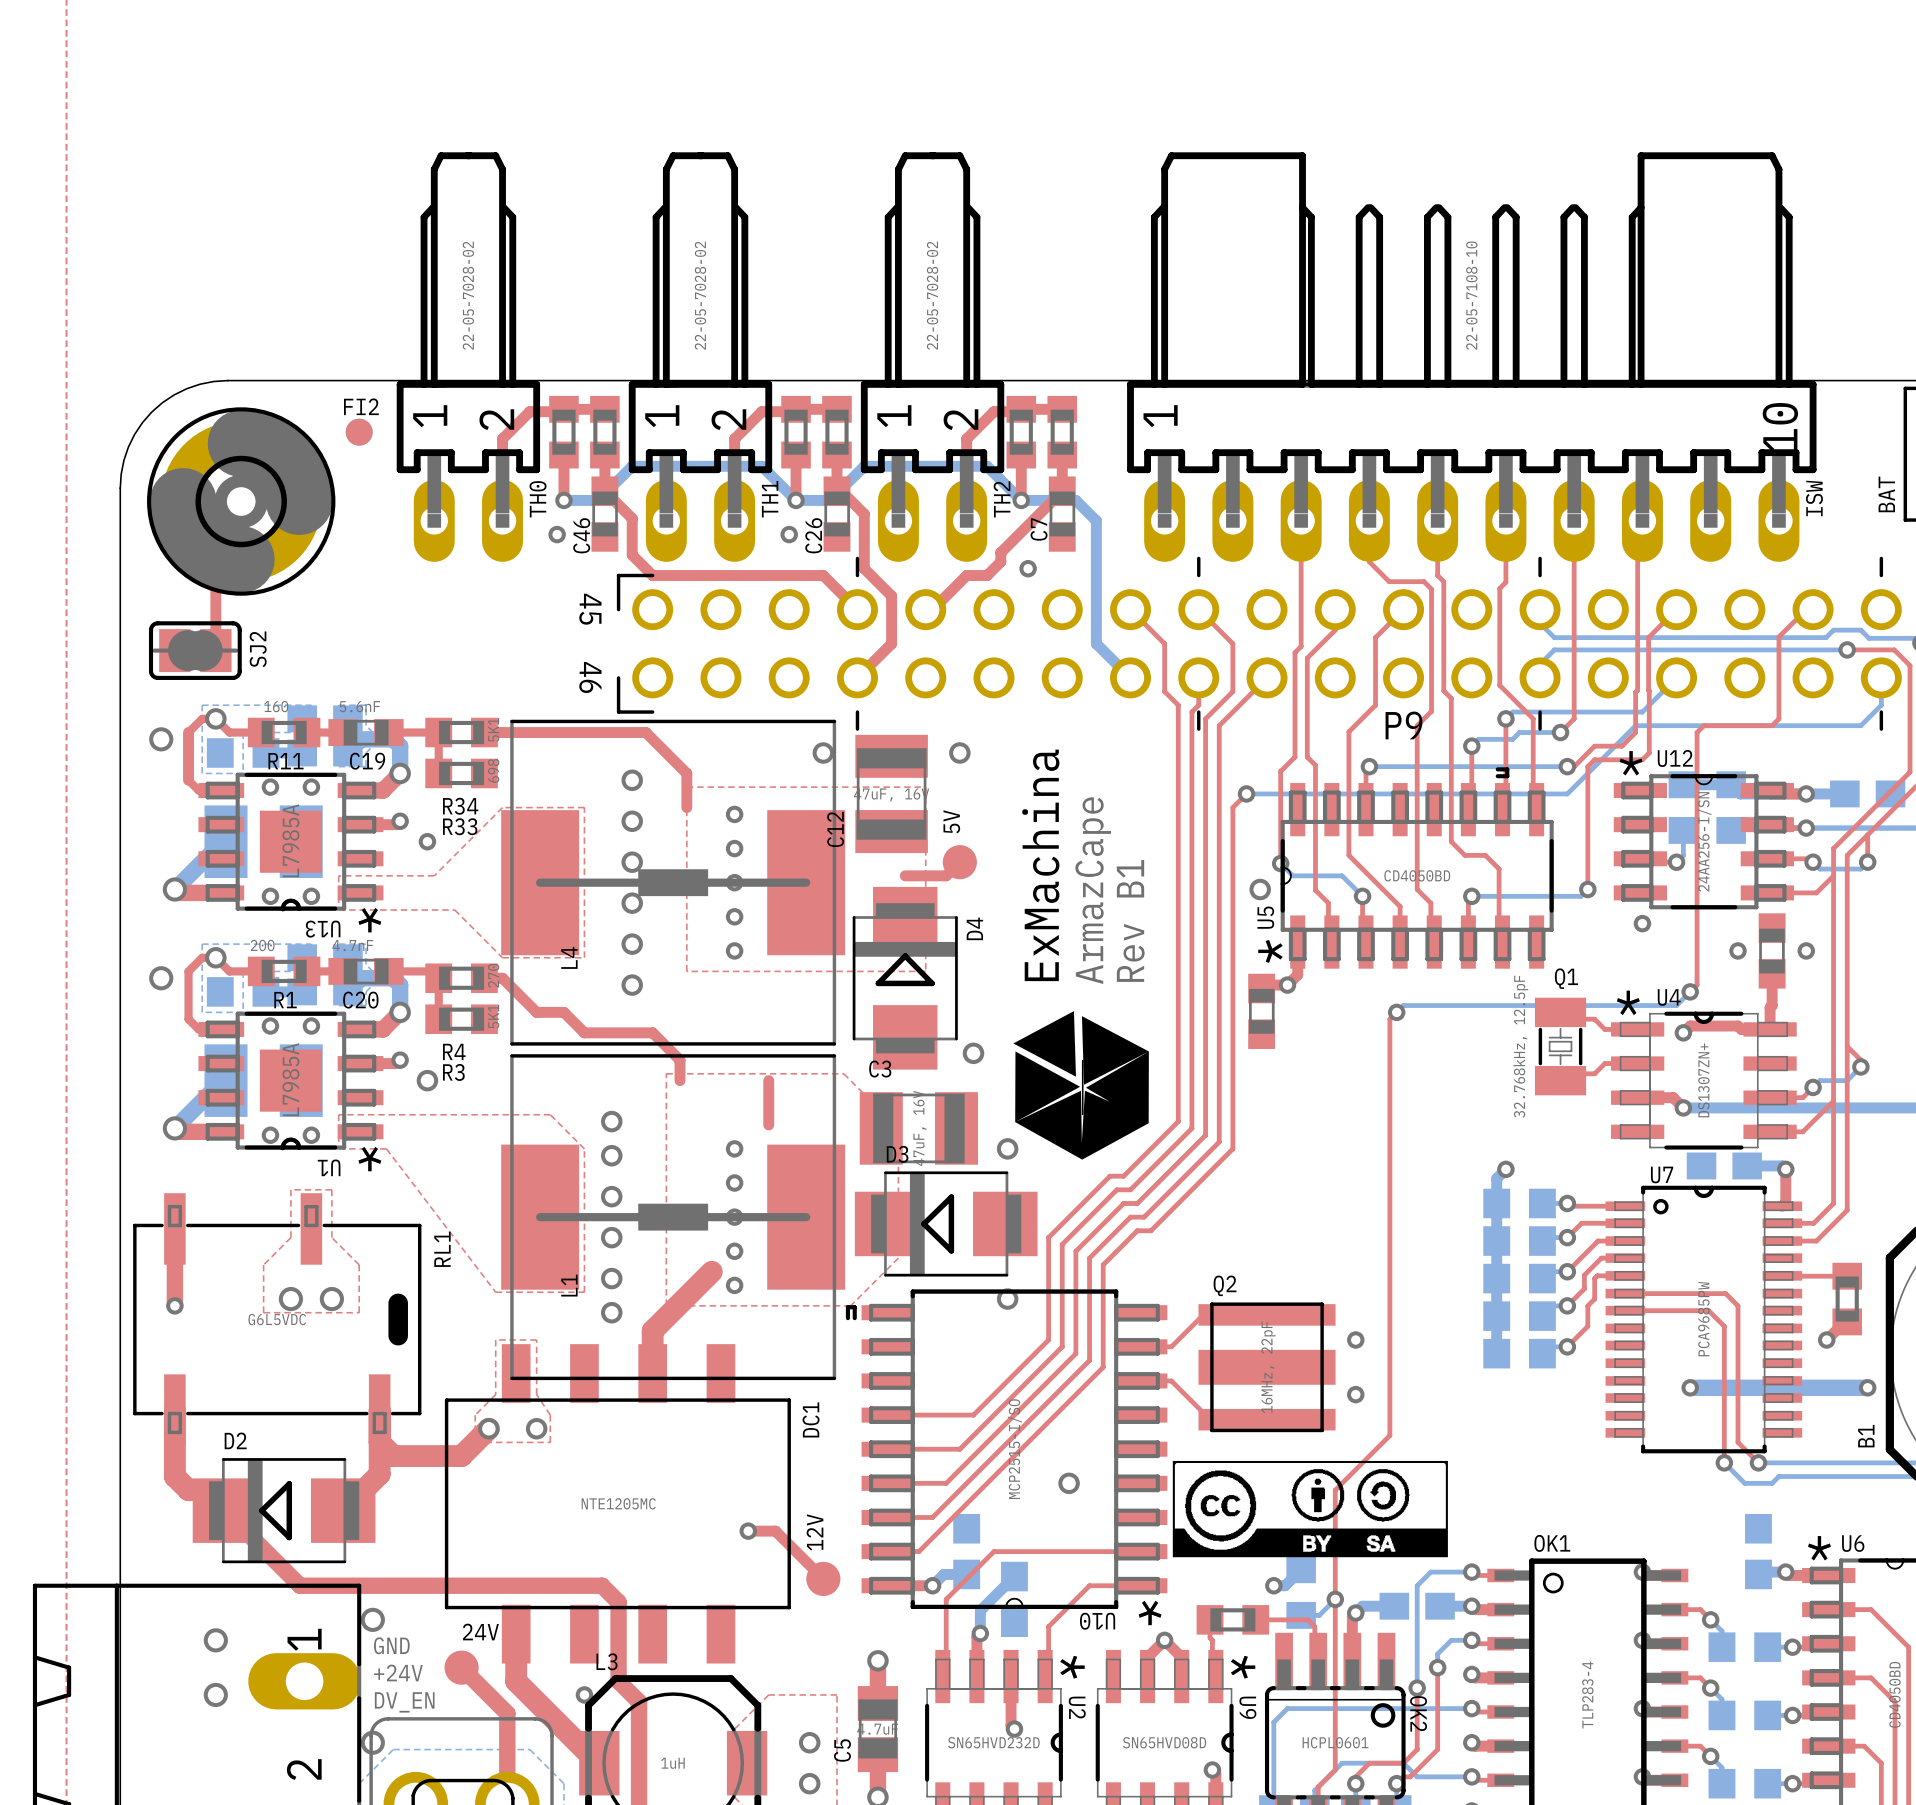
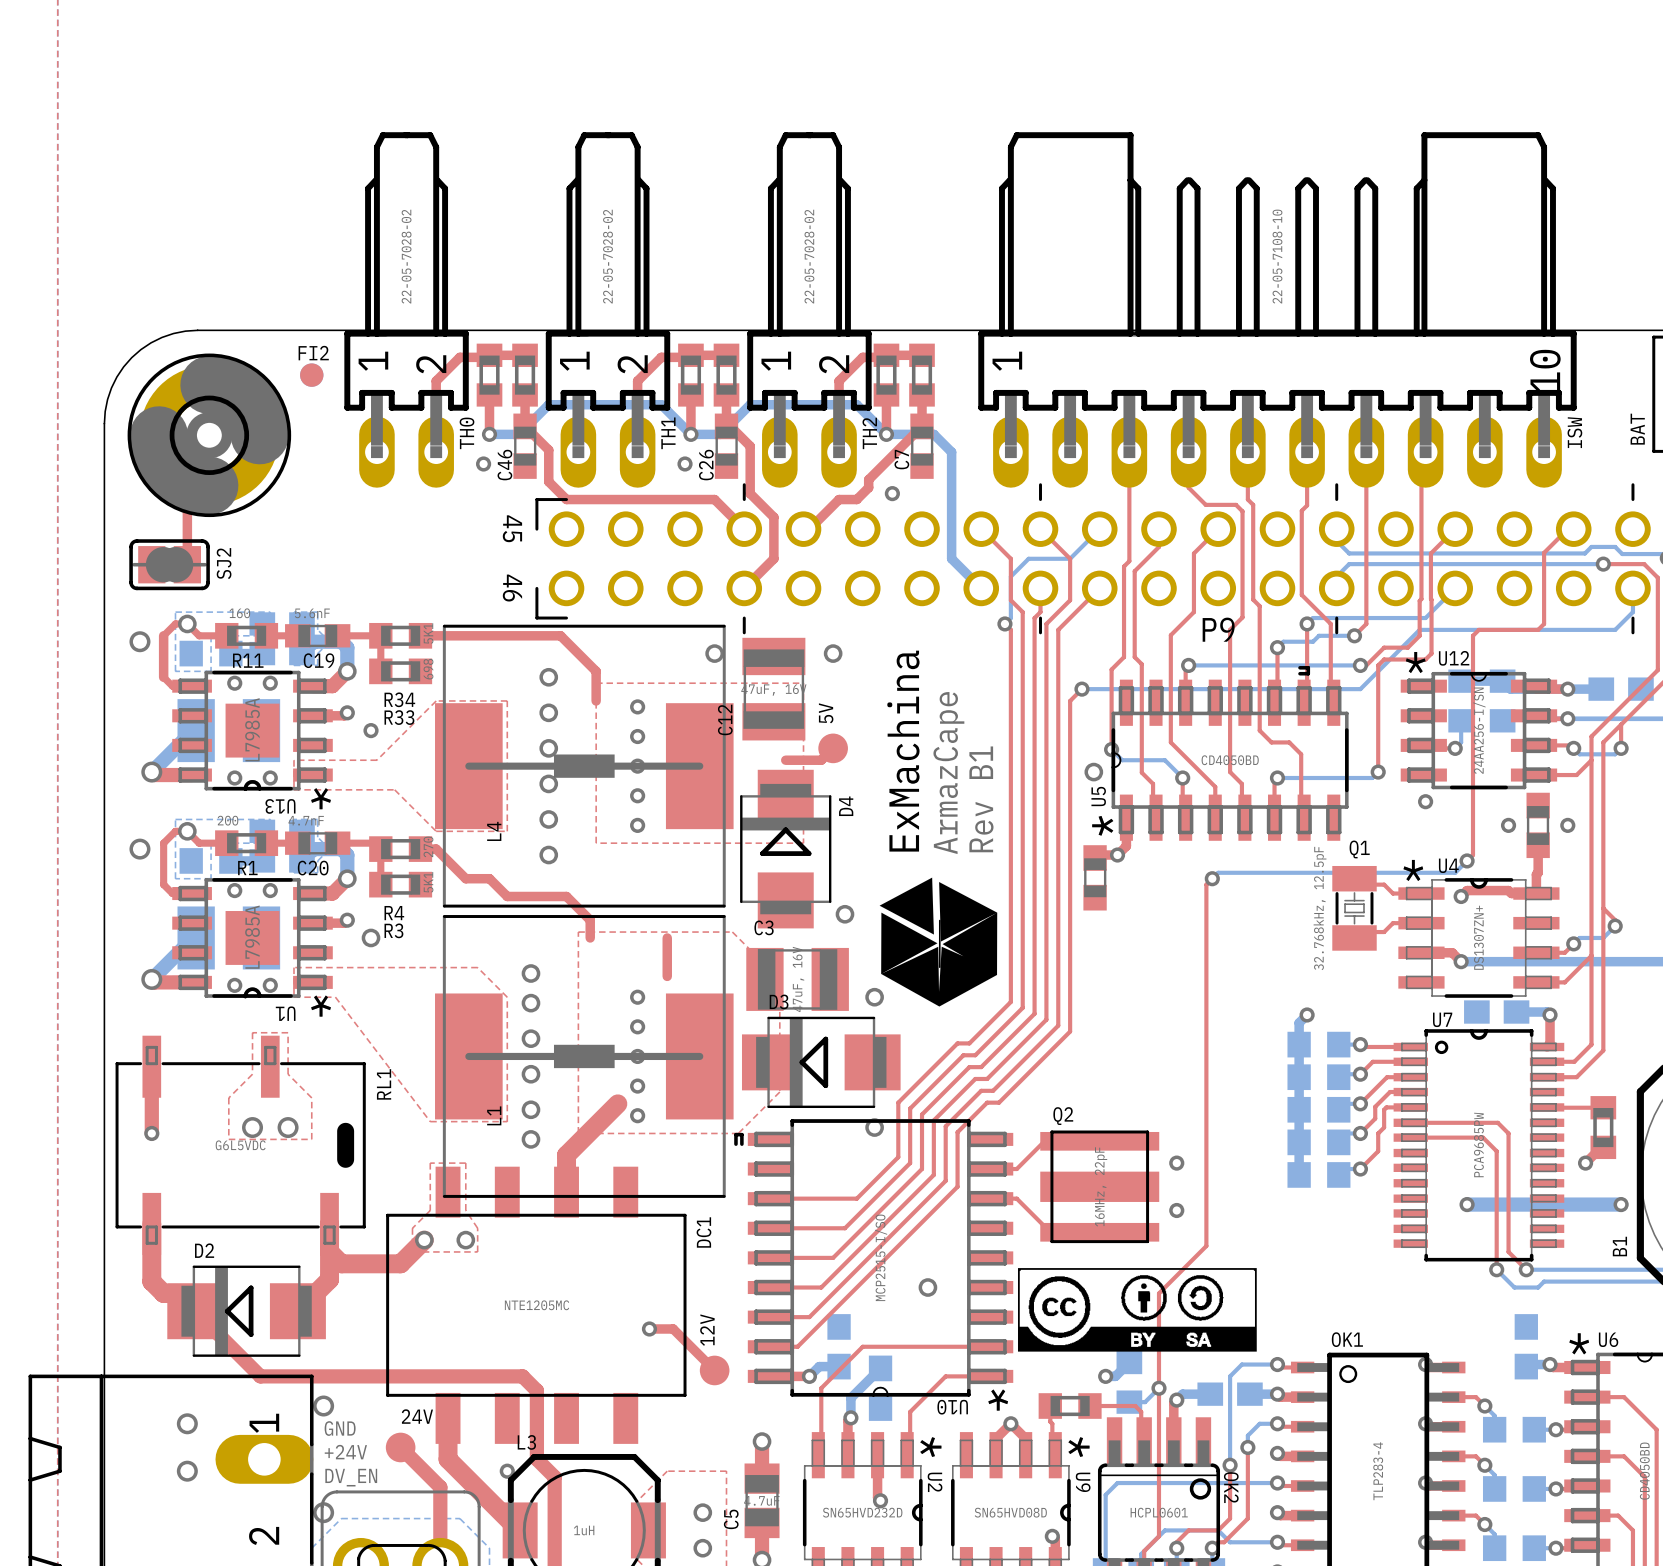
bottom track: none -> (1099, 529) (1070, 558) (1028, 558) (1010, 576) (1010, 618) (1004, 623)
top track: none -> (1004, 623) (1010, 629) (1010, 1001) (969, 1043) (957, 1043) (898, 1102) (898, 1157) (856, 1198) (770, 1198)
via: none -> (1004, 623)
top track: (1178, 1121) (1123, 1176) (1110, 1176) (1048, 1237) (1048, 1277) -> (1022, 973) (1022, 1007) (975, 1055) (963, 1055) (910, 1108)
top track: (1191, 1128) (1130, 1189) (1116, 1189) (1062, 1244) (1062, 1284) -> (1034, 979) (1034, 1013) (981, 1067) (969, 1067) (922, 1114)
top track: (1205, 1135) (1137, 1203) (1123, 1203) (1075, 1251) (1075, 1290) -> (1046, 985) (1046, 1019) (987, 1078) (975, 1078) (933, 1120)
top track: (1219, 1142) (1144, 1217) (1130, 1217) (1089, 1258) (1089, 1297) -> (1058, 991) (1058, 1025) (993, 1090) (981, 1090) (945, 1126)
top track: (1232, 1148) (1150, 1230) (1137, 1230) (1103, 1264) (1103, 1304) -> (1070, 997) (1070, 1031) (999, 1102) (987, 1102) (957, 1132)

